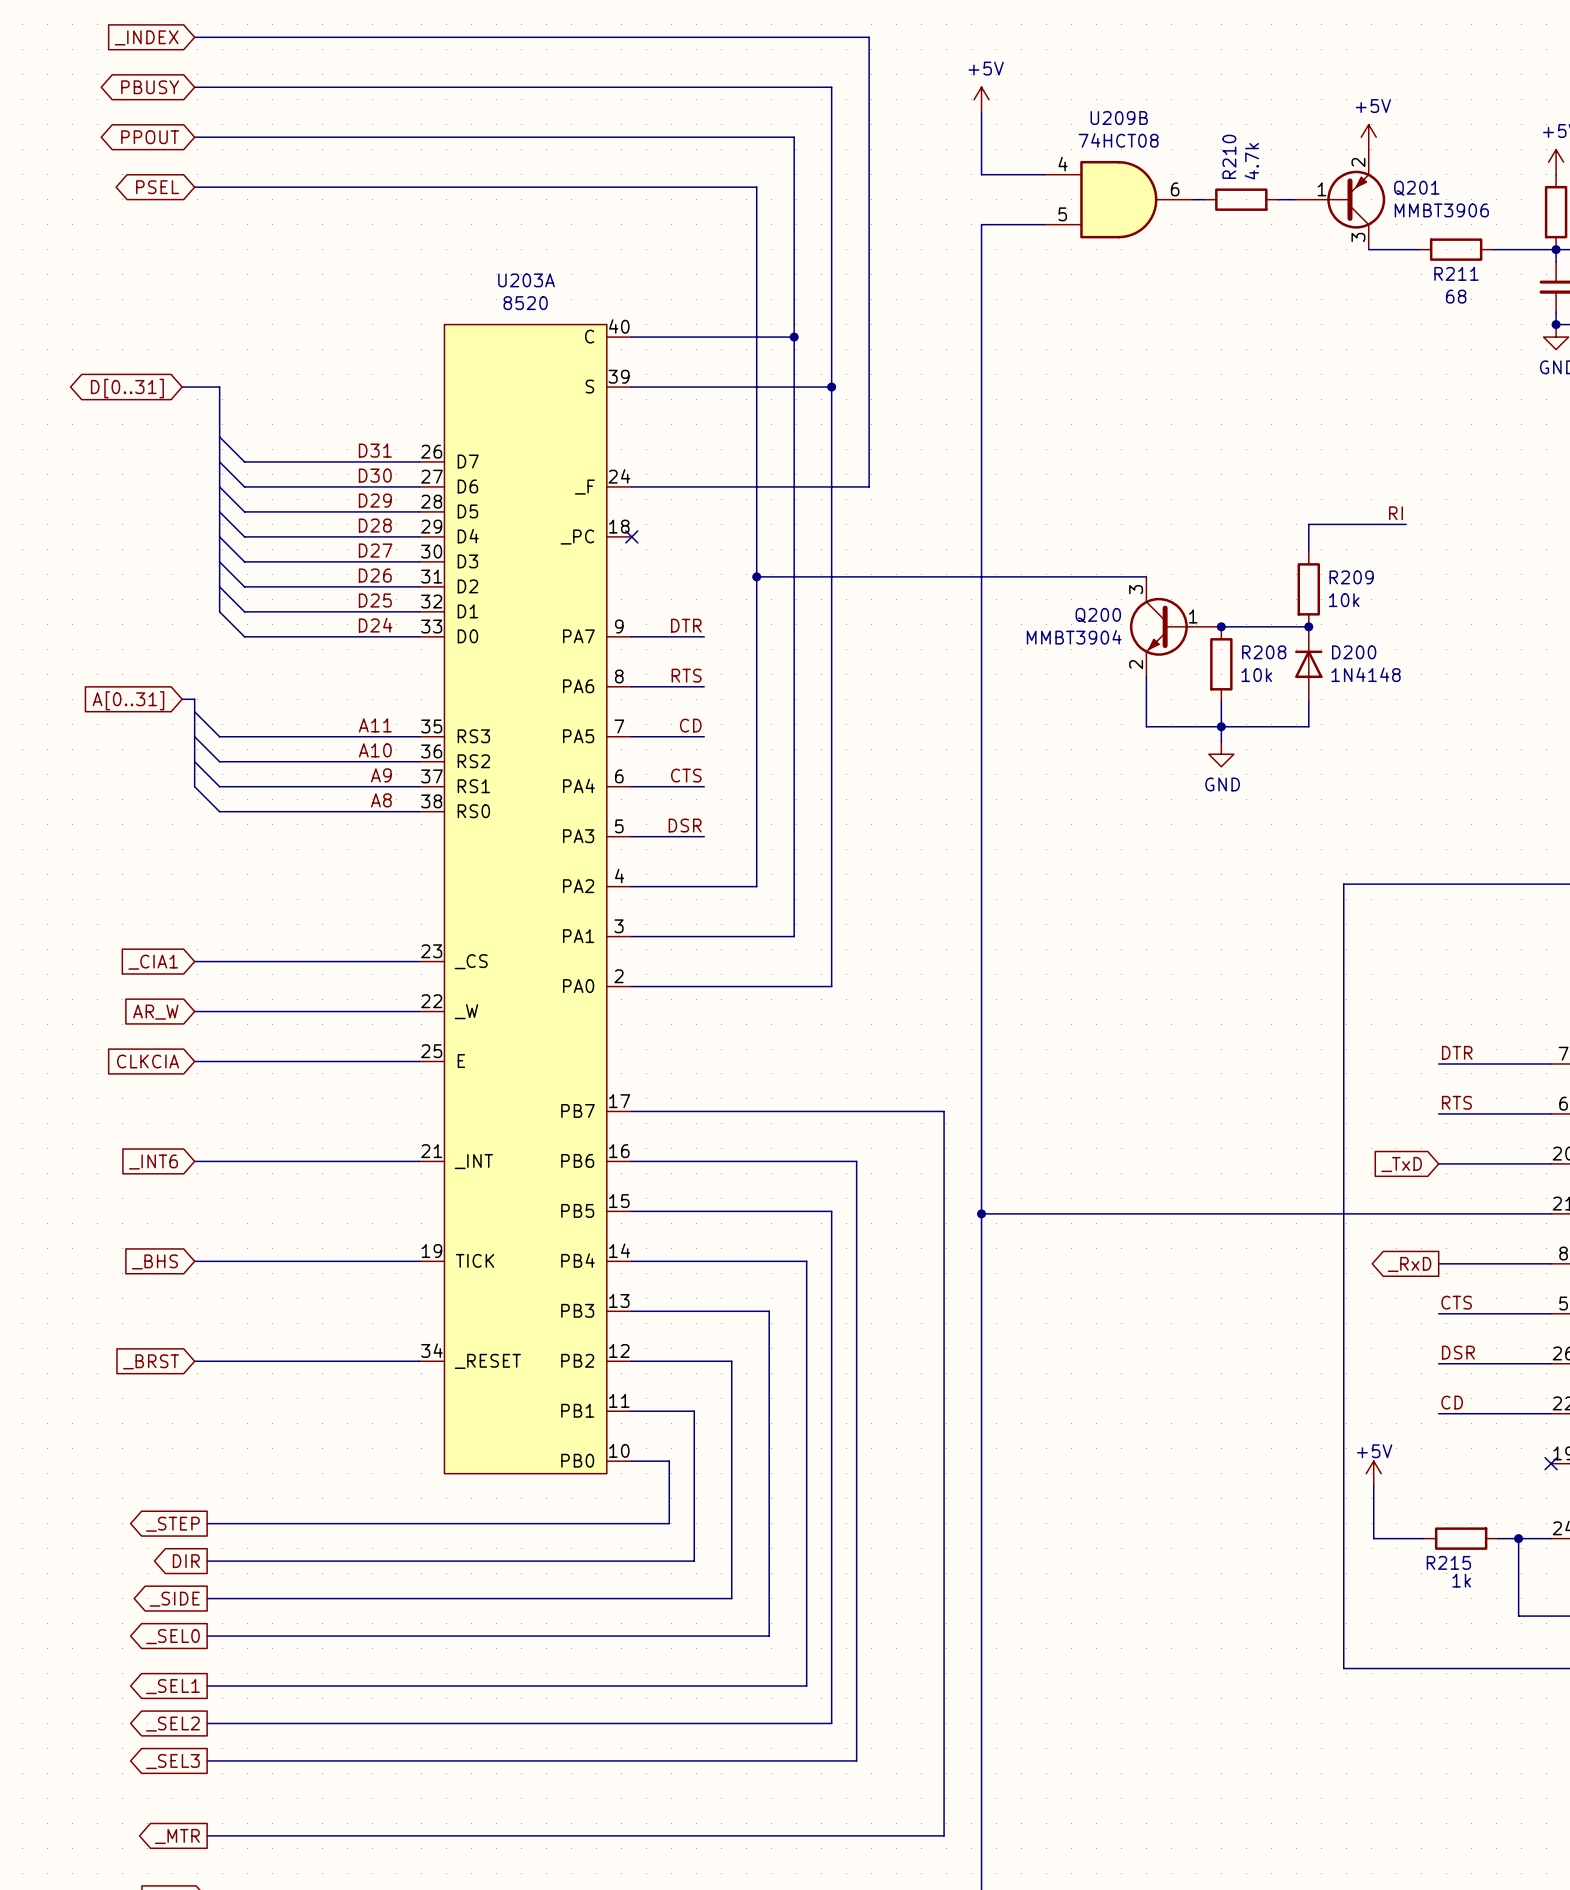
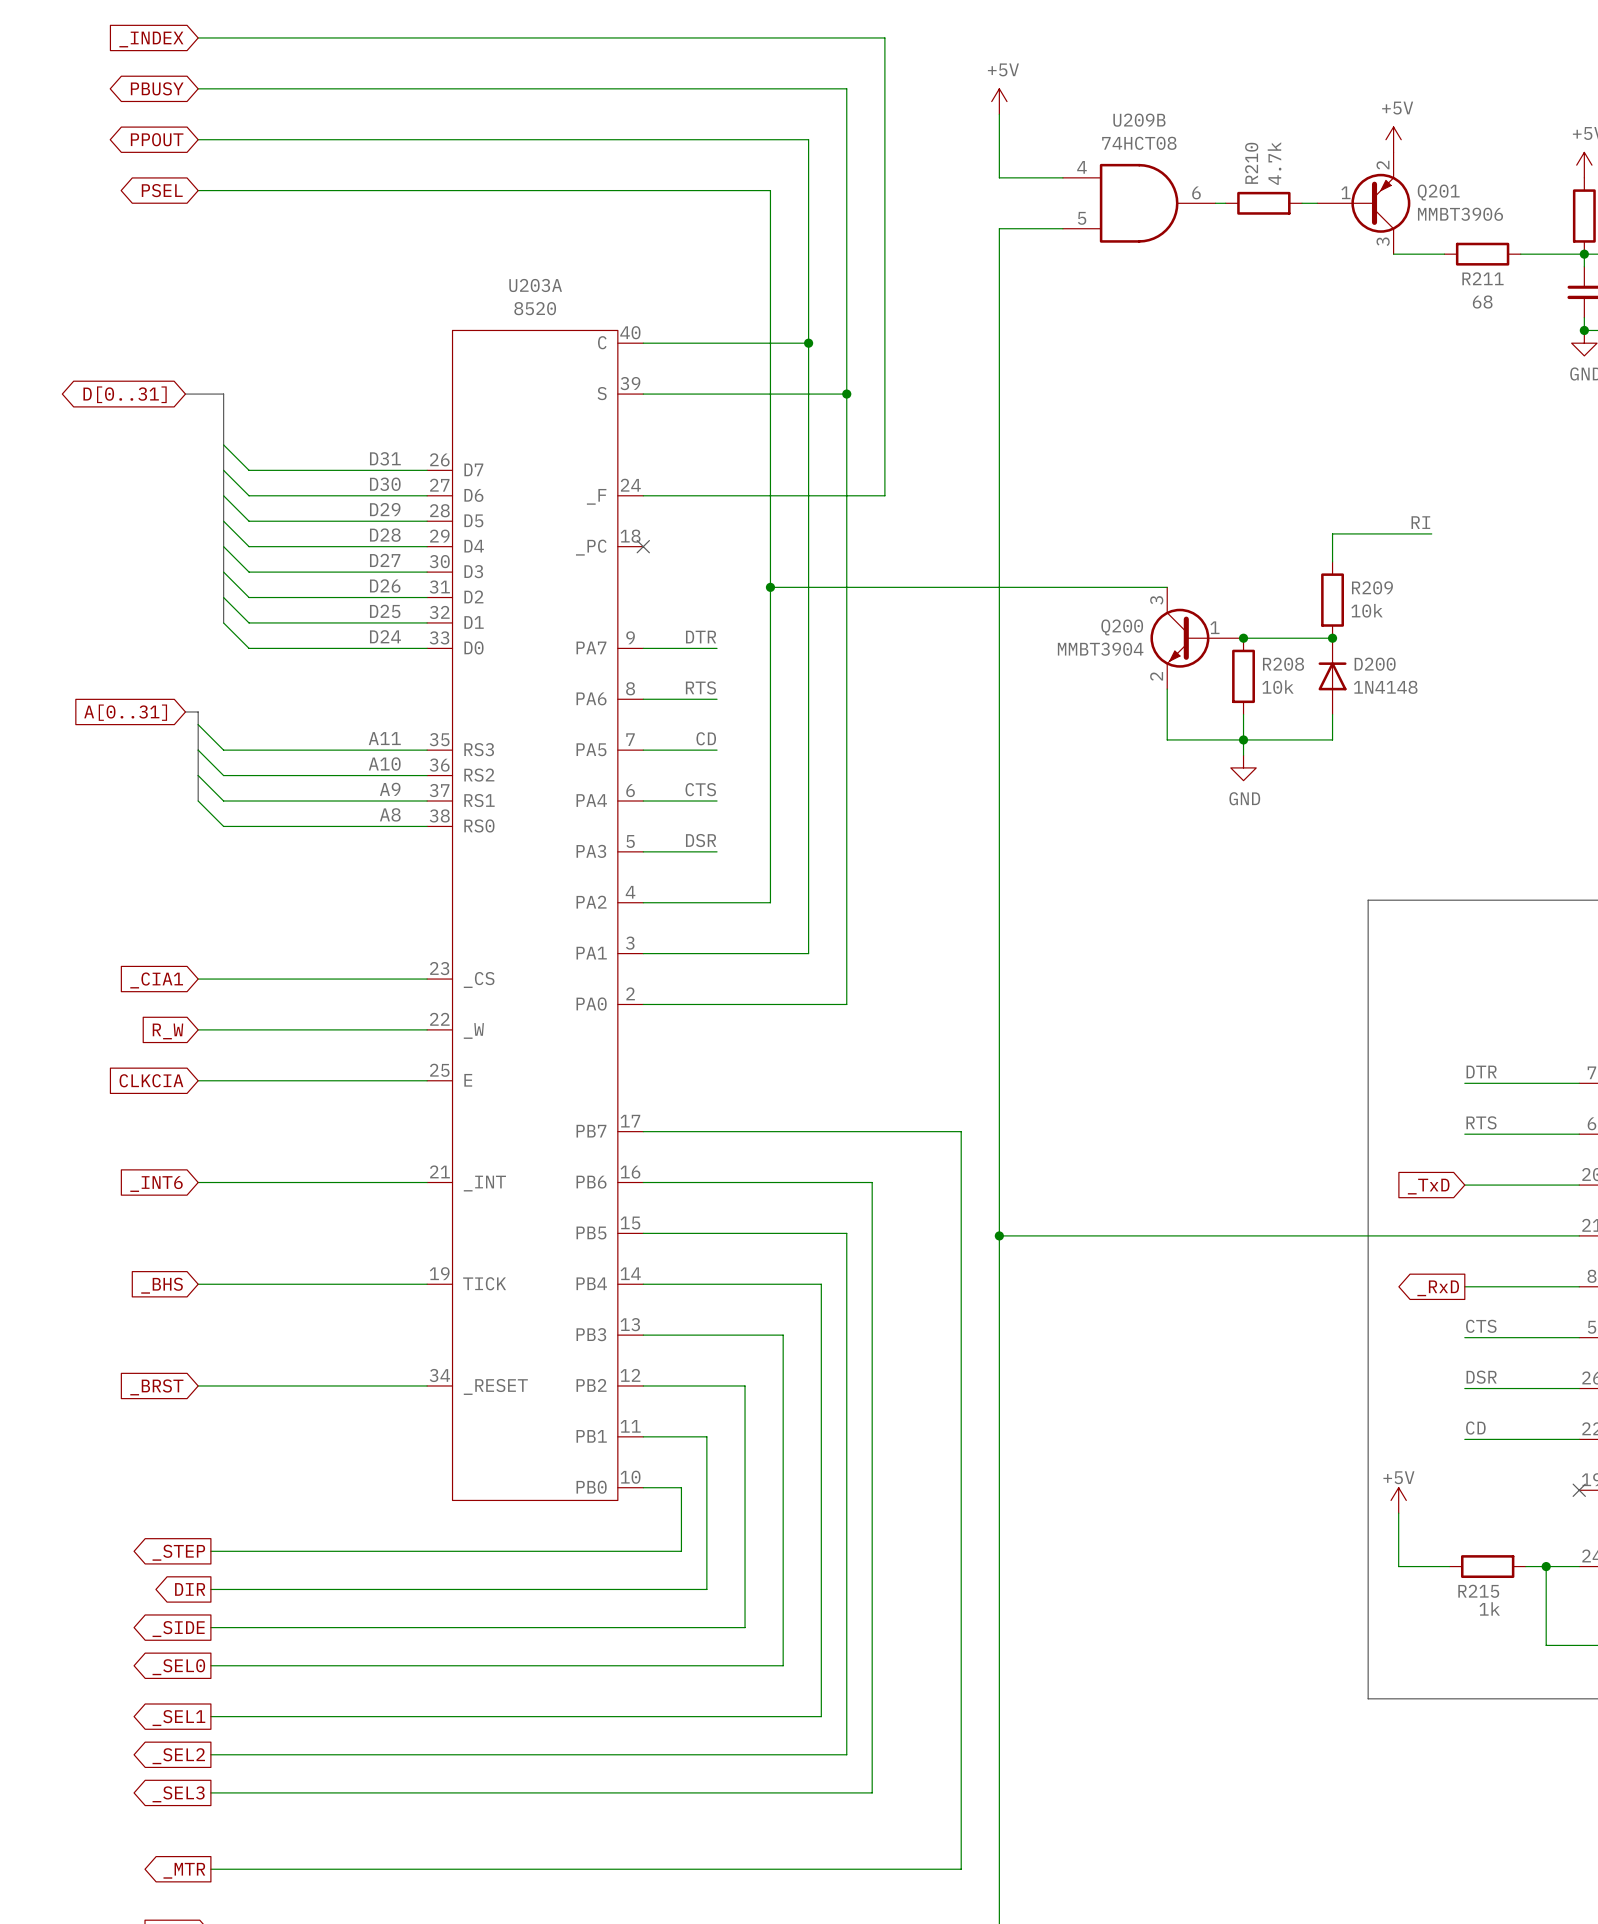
global label: AR_W (155, 1012) -> R_W (167, 1031)

